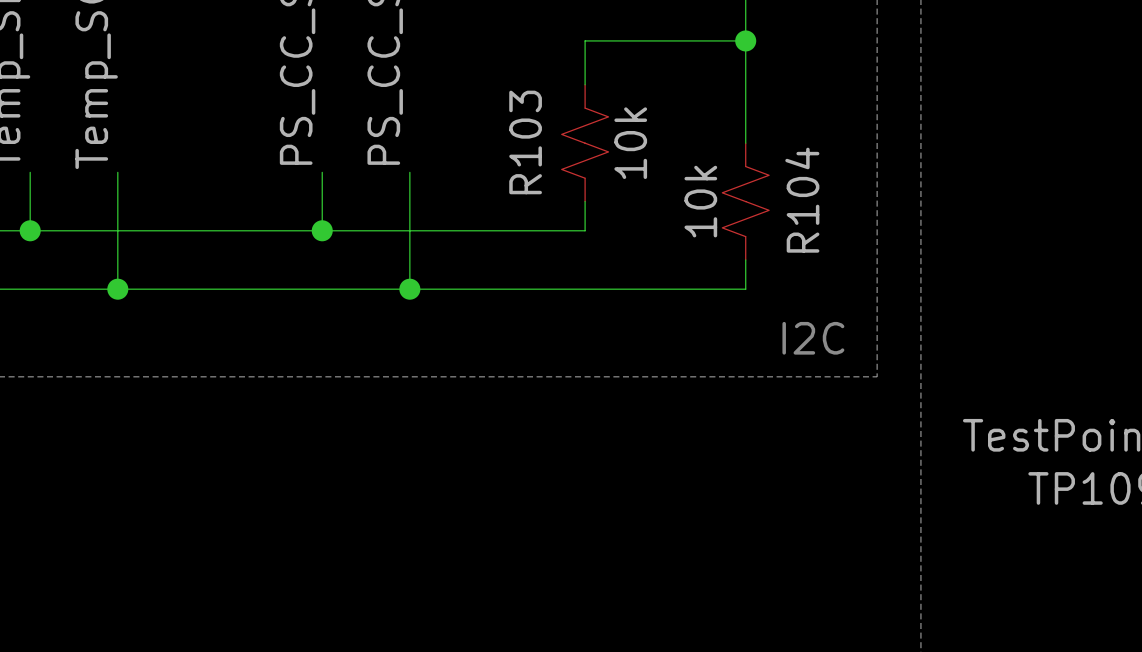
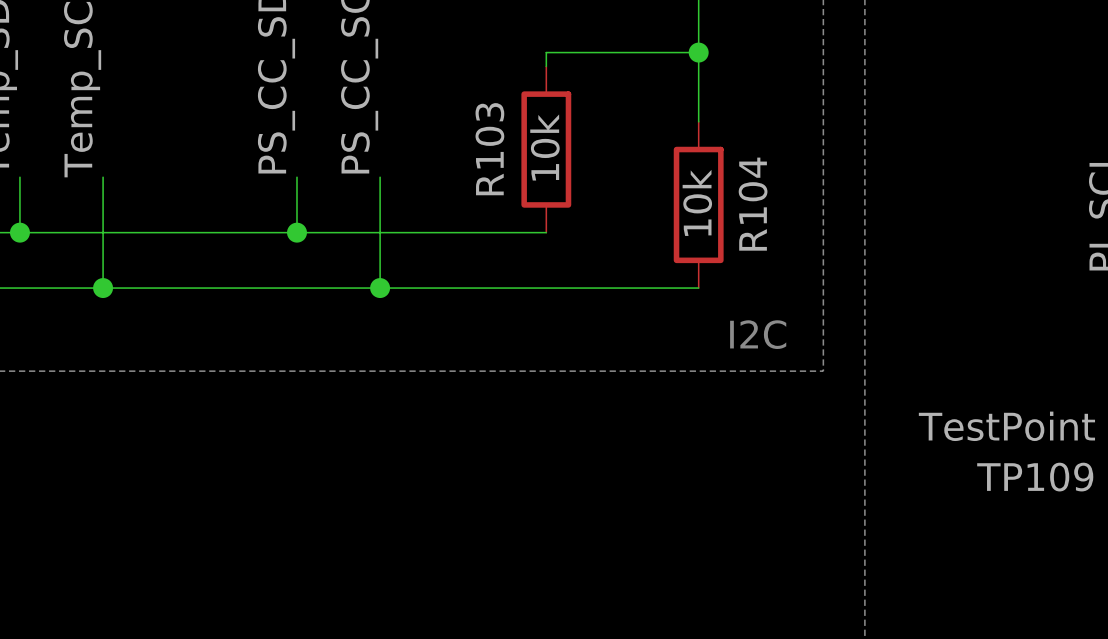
R103 symbol: [561, 84, 609, 202] -> [521, 66, 572, 233]
R103 value position: 10k (630, 143) -> 10k (544, 147)
R104 symbol: [722, 143, 770, 260] -> [673, 121, 724, 289]

